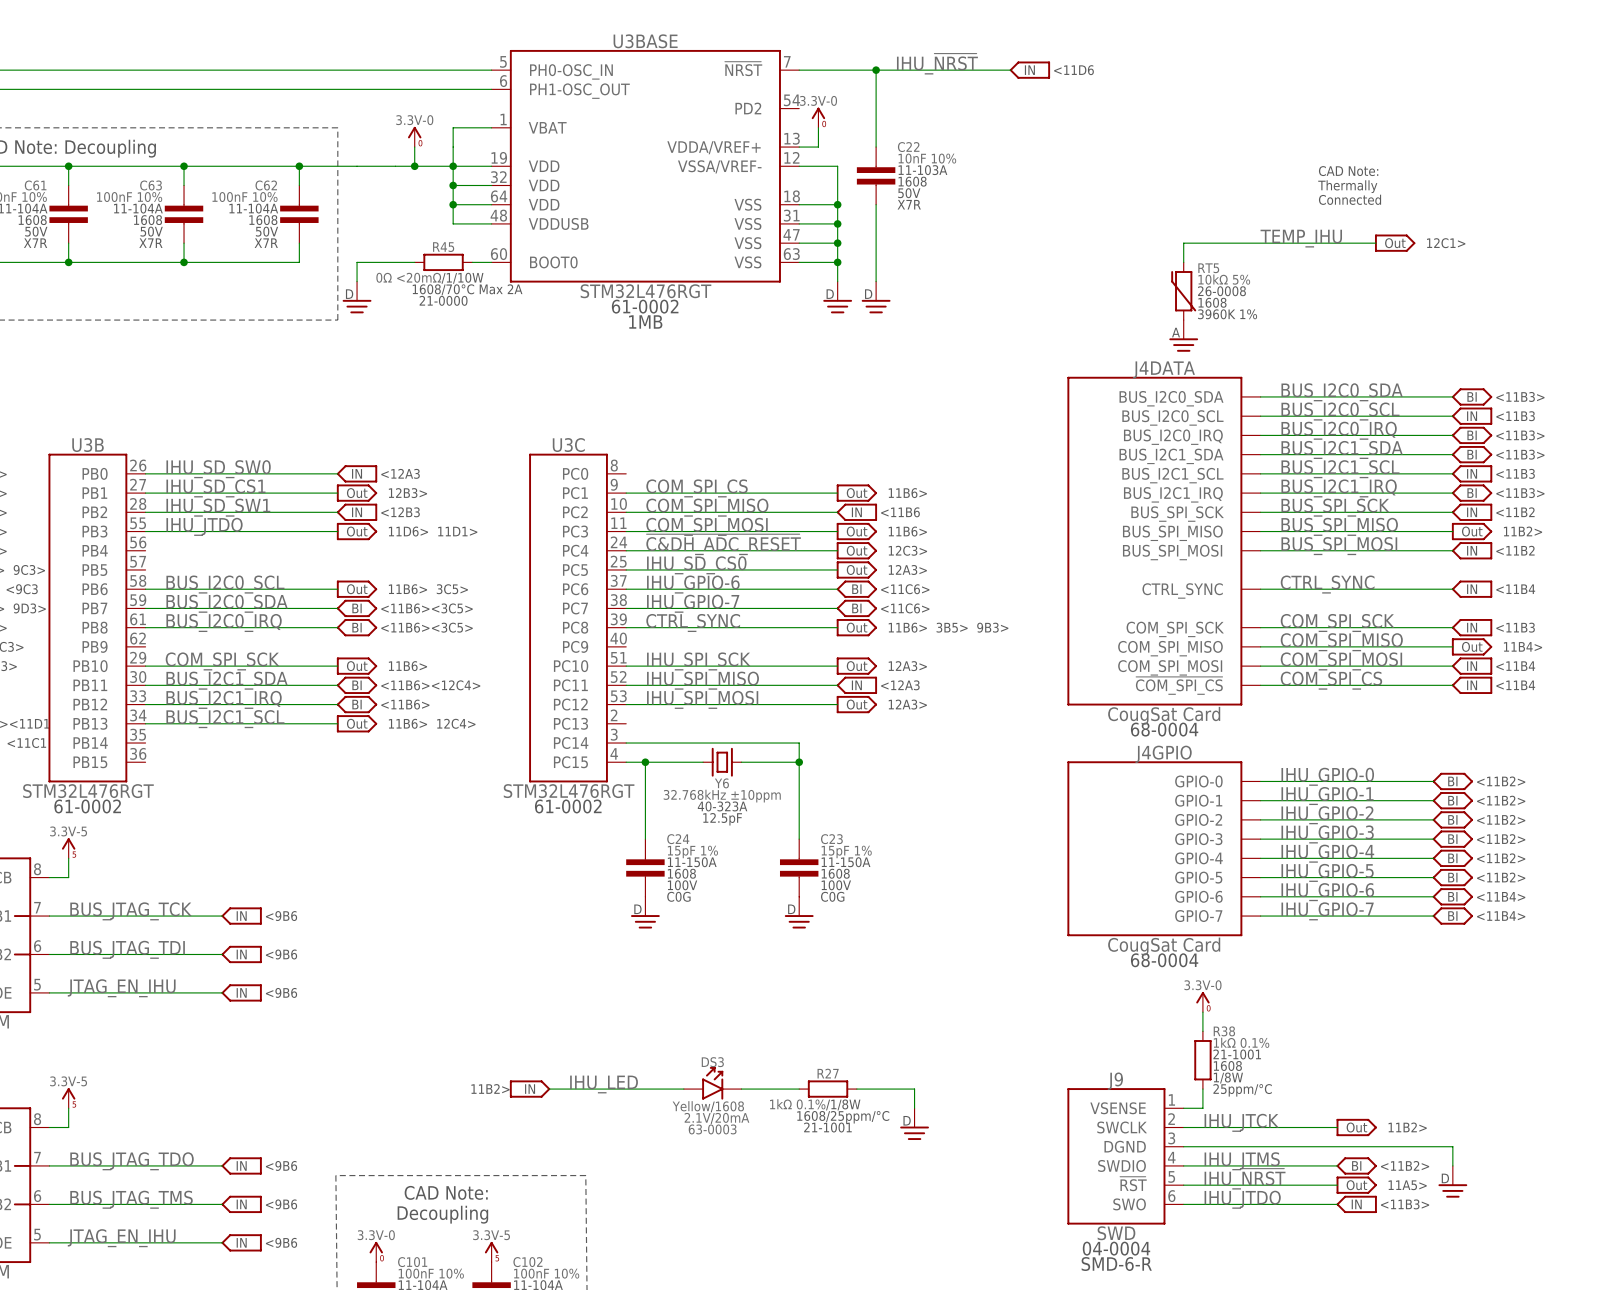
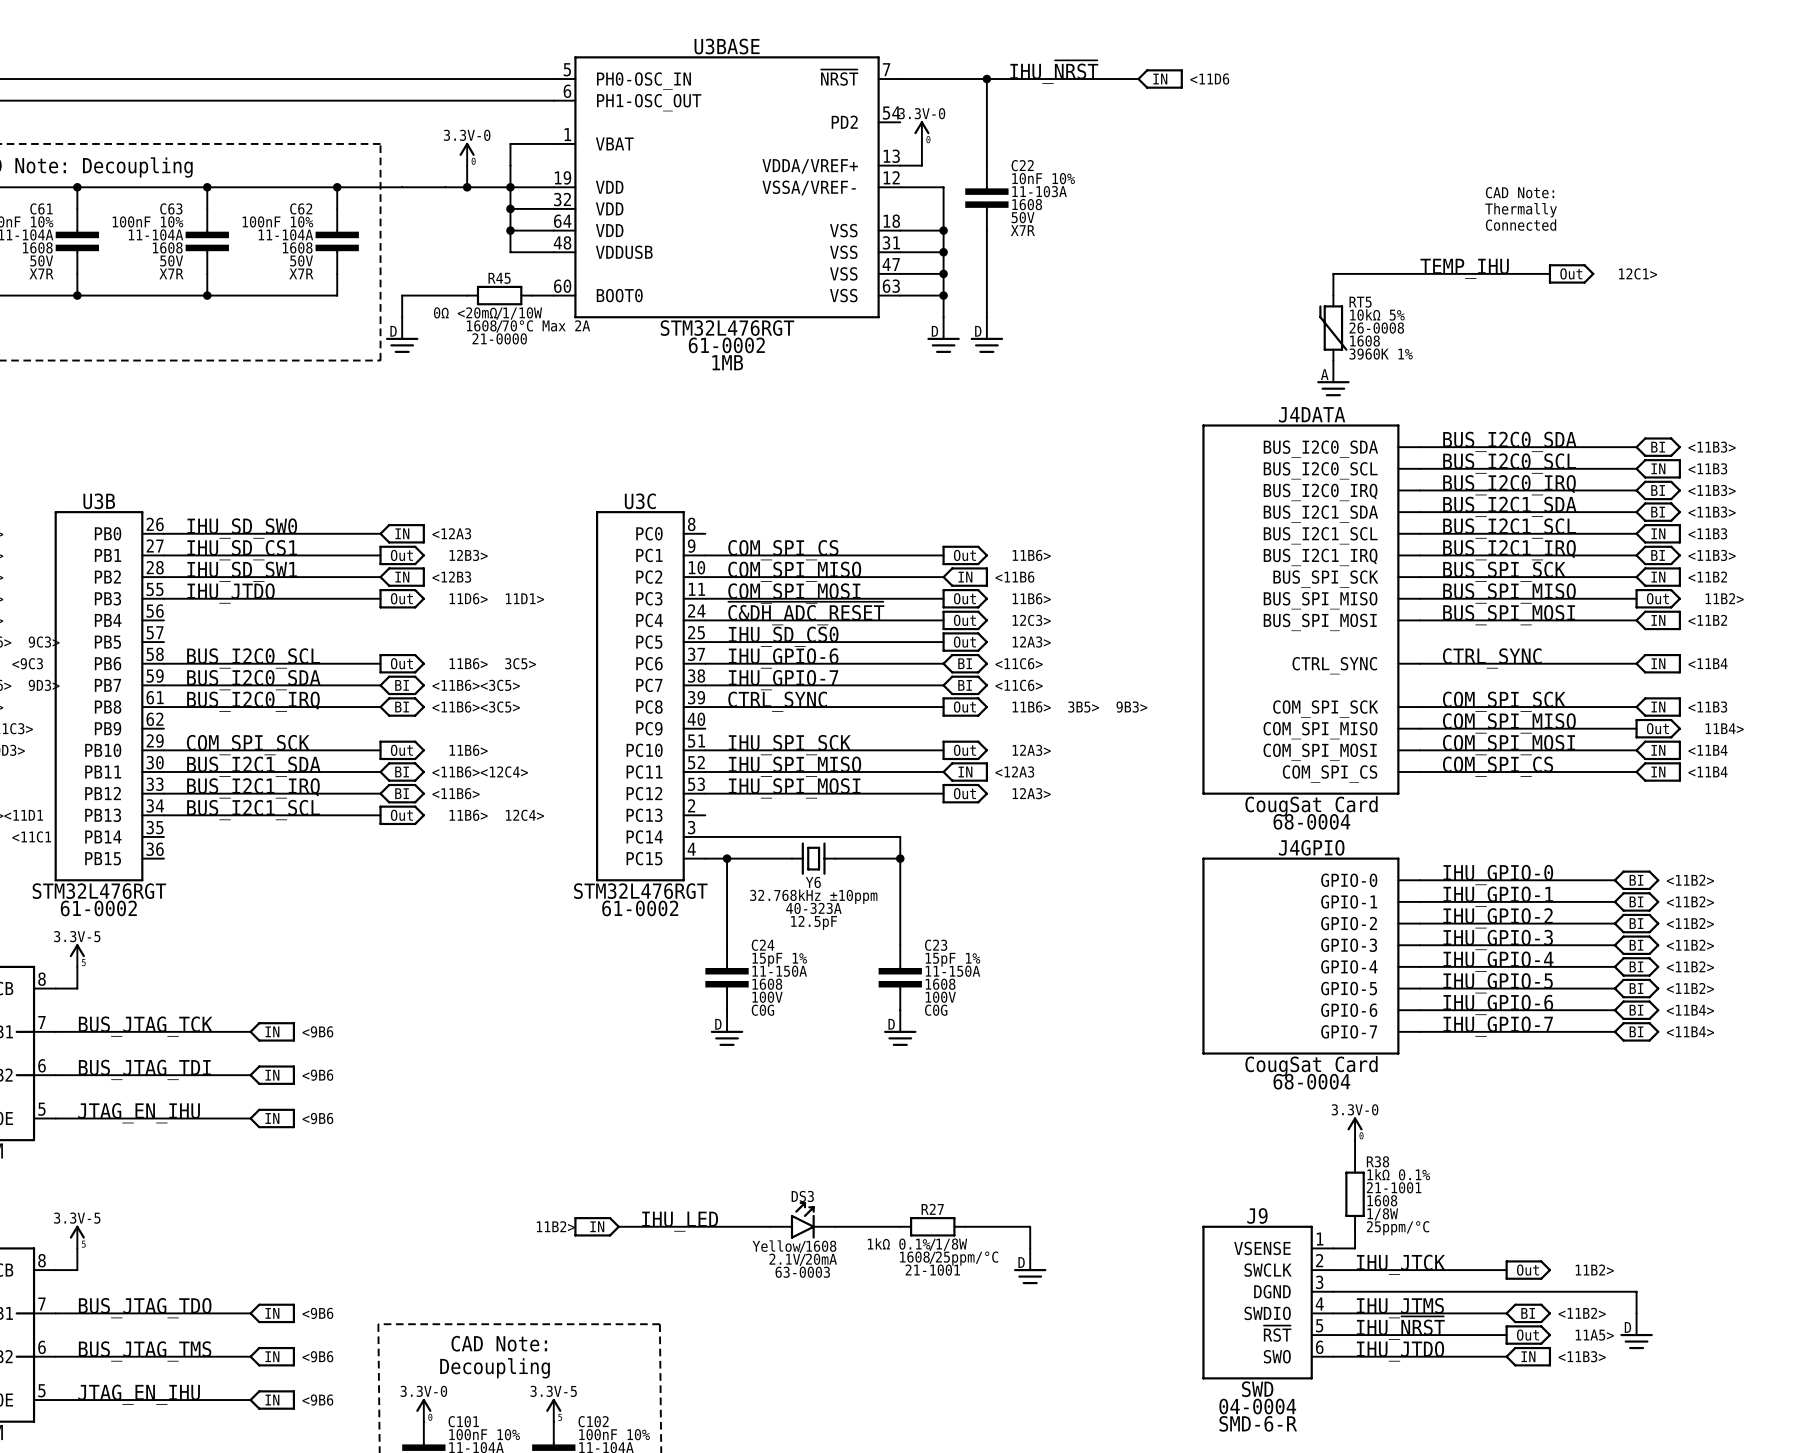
J4DATA pin name: ~{COM_SPI_CS} (1179, 685) -> COM_SPI_CS (1330, 773)

